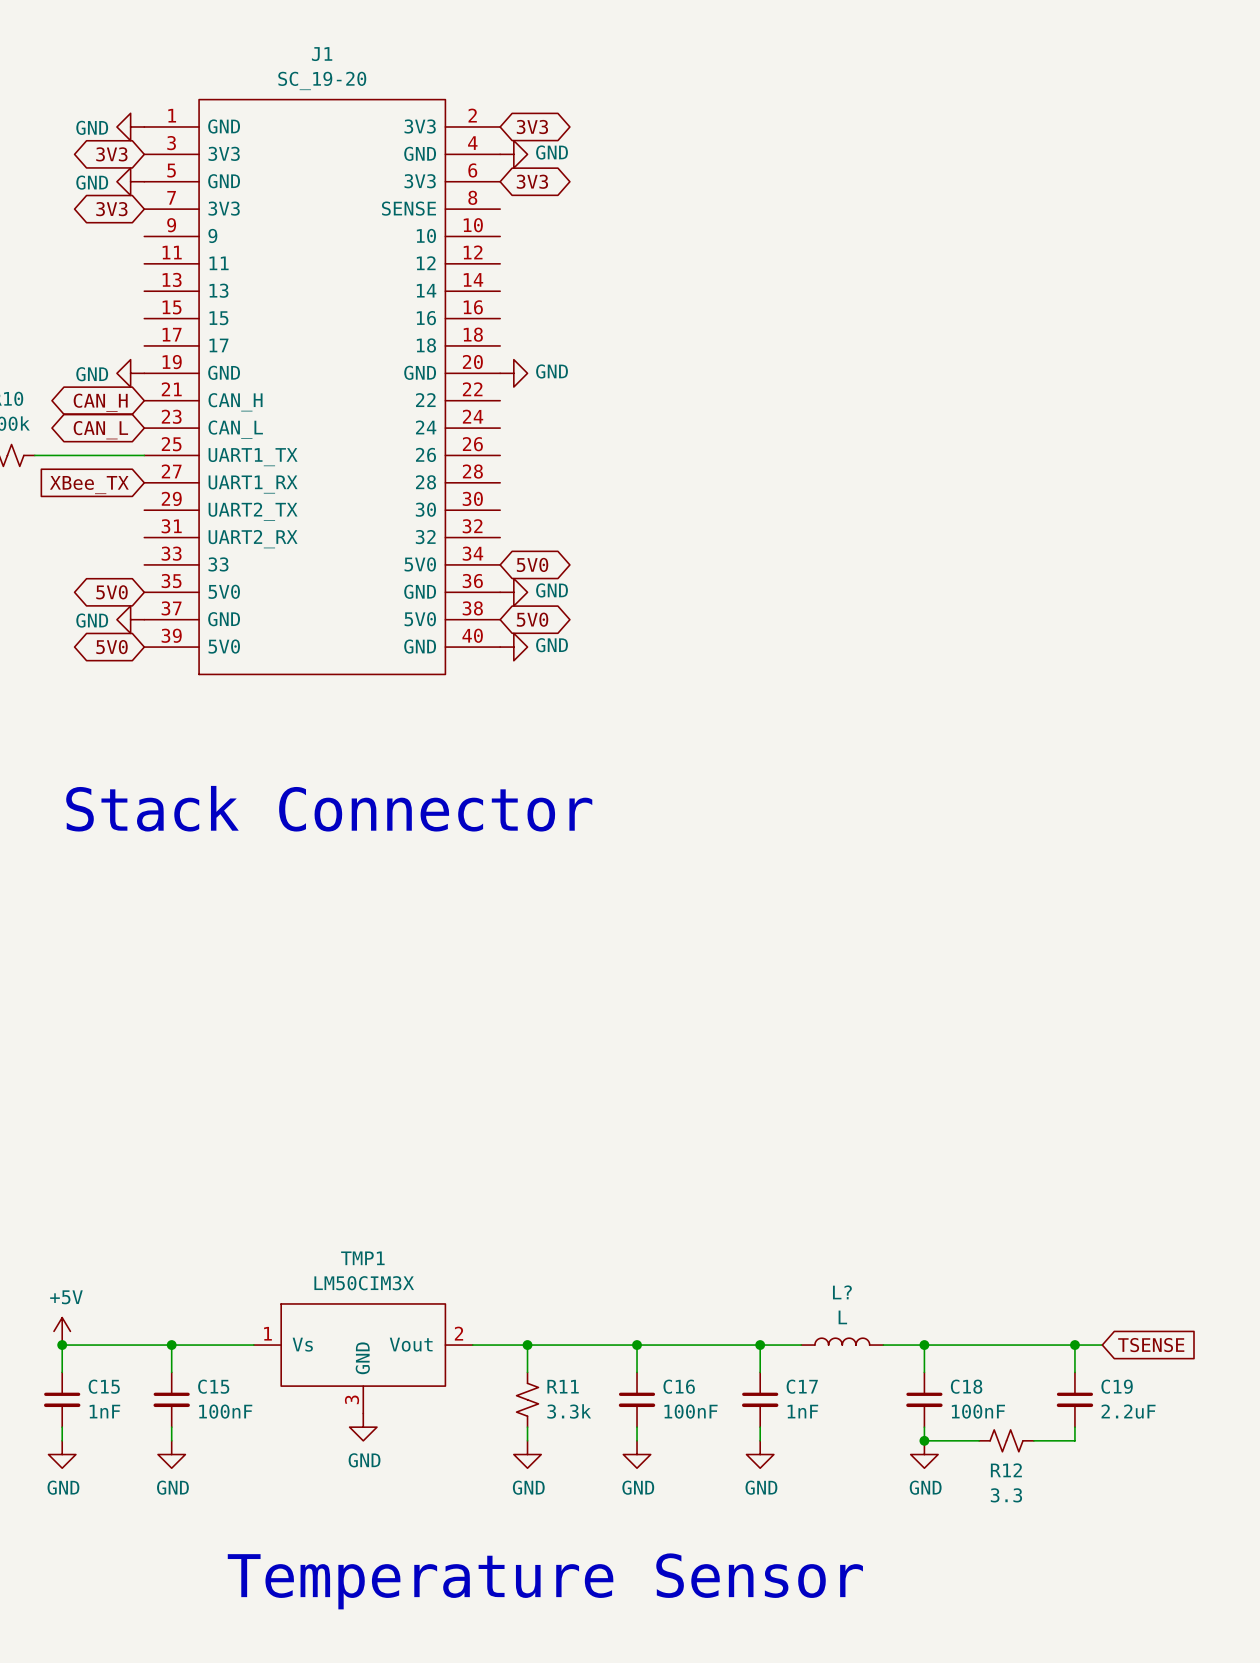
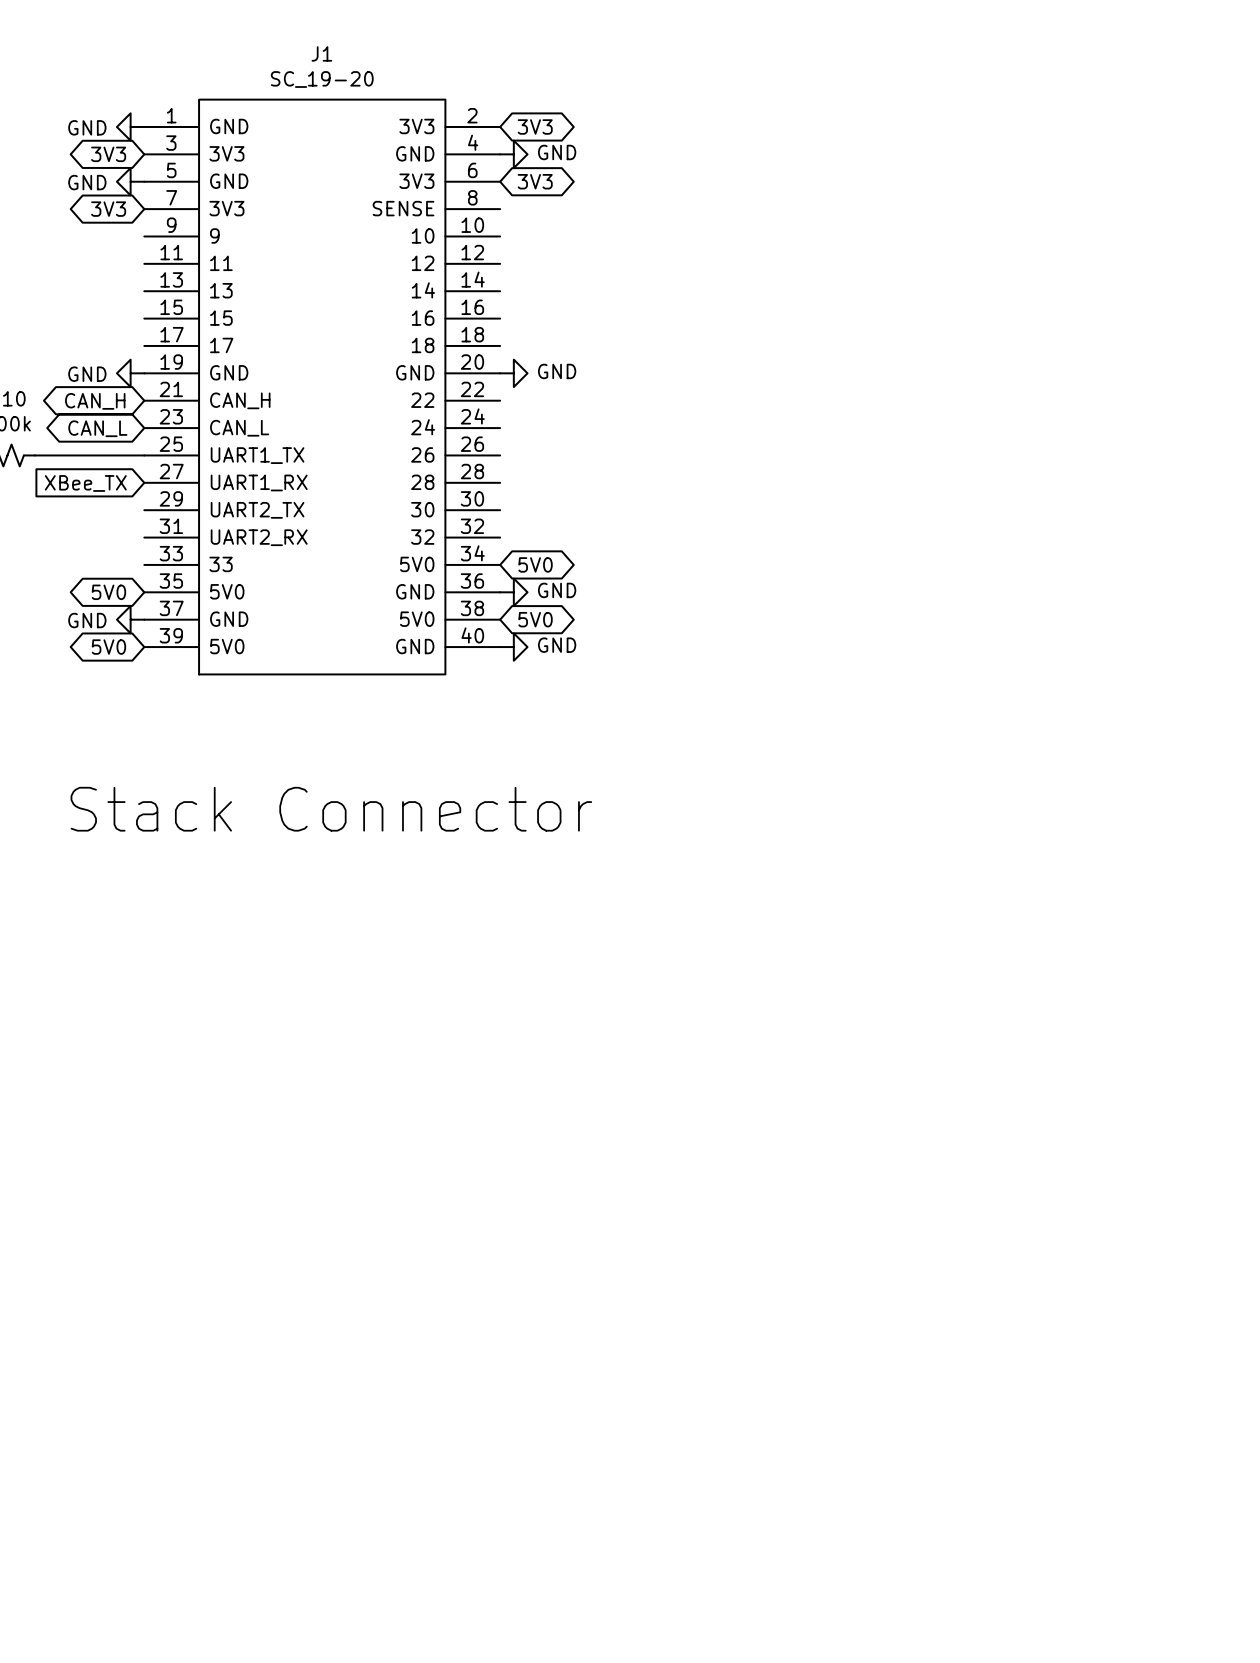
power symbol: +5V (62, 1331) -> none
L?: L (842, 1341) -> none
junction: (62, 1345) -> none
wire: (171, 1345) (171, 1372) -> none
junction: (171, 1345) -> none
wire: (253, 1345) (62, 1345) (62, 1372) -> none
wire: (472, 1345) (801, 1345) -> none
wire: (527, 1345) (527, 1372) -> none
junction: (527, 1345) -> none
wire: (637, 1345) (637, 1372) -> none
junction: (637, 1345) -> none
wire: (760, 1345) (760, 1372) -> none
junction: (760, 1345) -> none
wire: (883, 1345) (1102, 1345) -> none
wire: (924, 1345) (924, 1372) -> none
junction: (924, 1345) -> none
wire: (1074, 1345) (1074, 1372) -> none
junction: (1074, 1345) -> none
global label: TSENSE (1151, 1345) -> none
TMP1: LM50CIM3X (363, 1358) -> none
C15: 1nF (62, 1399) -> none
C15: 100nF (171, 1399) -> none
R11: 3.3k (527, 1399) -> none
C16: 100nF (637, 1399) -> none
C17: 1nF (760, 1399) -> none
C18: 100nF (924, 1399) -> none
C19: 2.2uF (1074, 1399) -> none
wire: (62, 1427) (62, 1440) -> none
wire: (171, 1427) (171, 1440) -> none
power symbol: GND (363, 1427) -> none
wire: (527, 1427) (527, 1440) -> none
wire: (637, 1427) (637, 1440) -> none
wire: (760, 1427) (760, 1440) -> none
wire: (924, 1427) (924, 1440) (979, 1440) -> none
wire: (1074, 1427) (1074, 1440) (1033, 1440) -> none
junction: (924, 1440) -> none
R12: 3.3 (1006, 1440) -> none
power symbol: GND (62, 1454) -> none
power symbol: GND (171, 1454) -> none
power symbol: GND (527, 1454) -> none
power symbol: GND (637, 1454) -> none
power symbol: GND (760, 1454) -> none
power symbol: GND (924, 1454) -> none
text: Temperature Sensor (545, 1581) -> none

